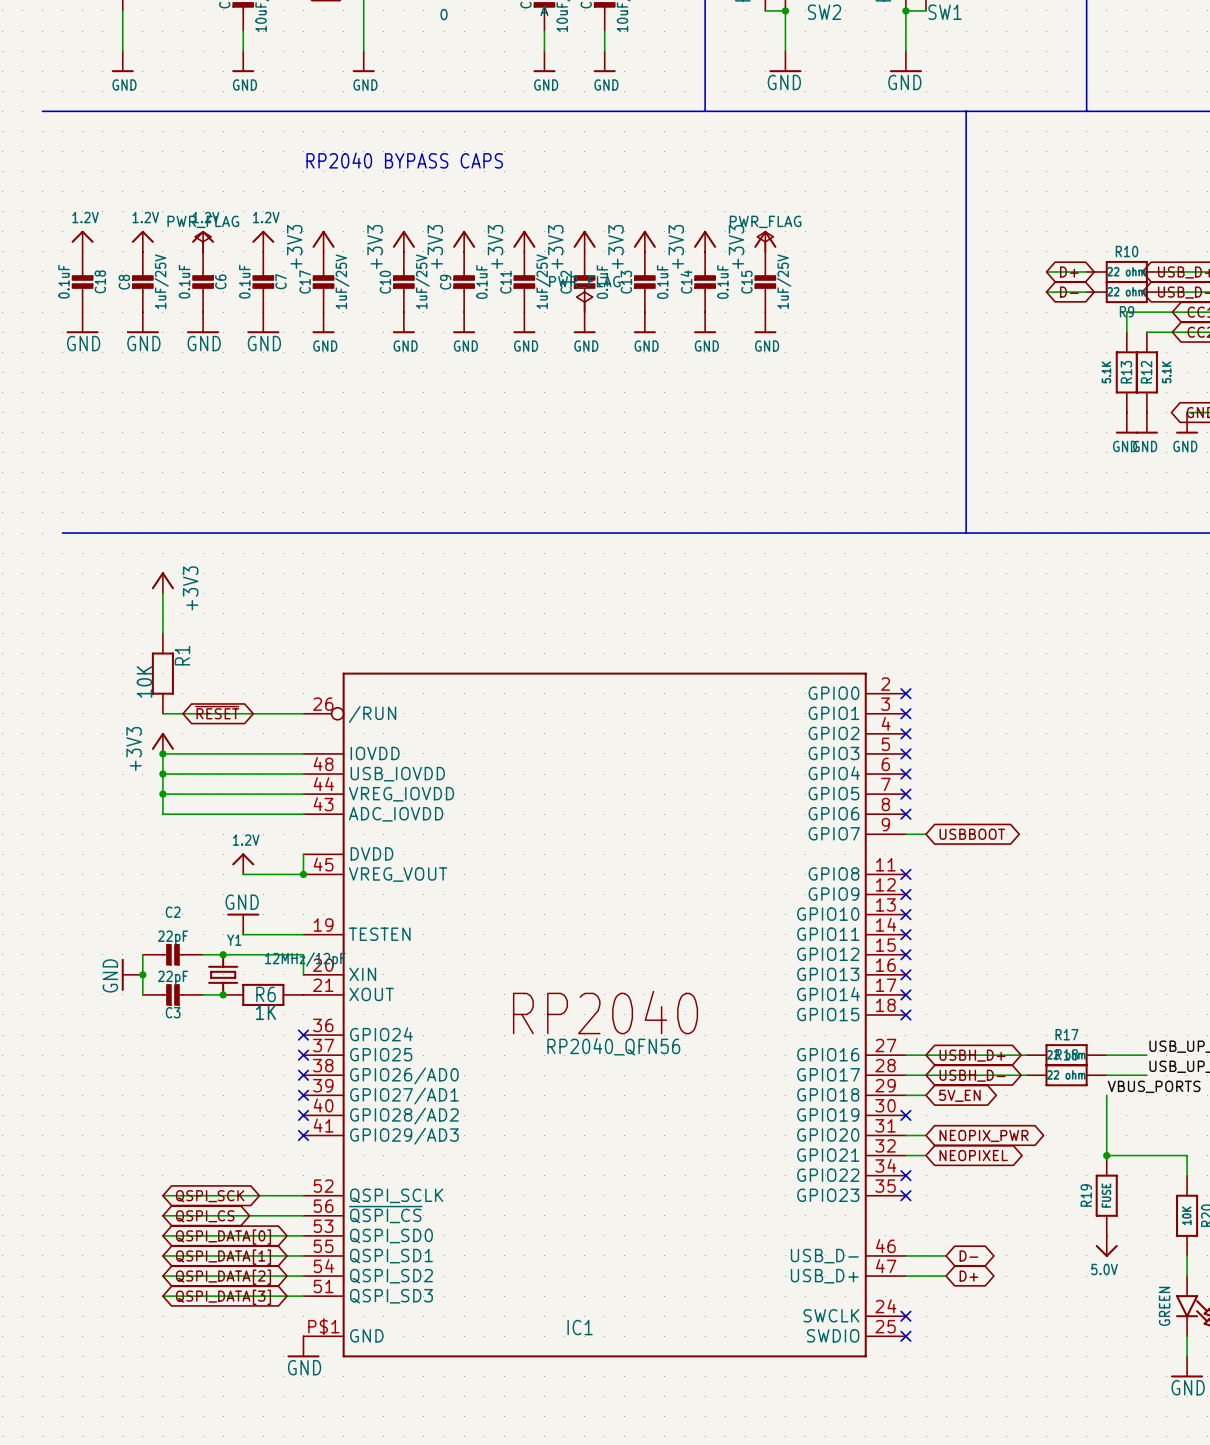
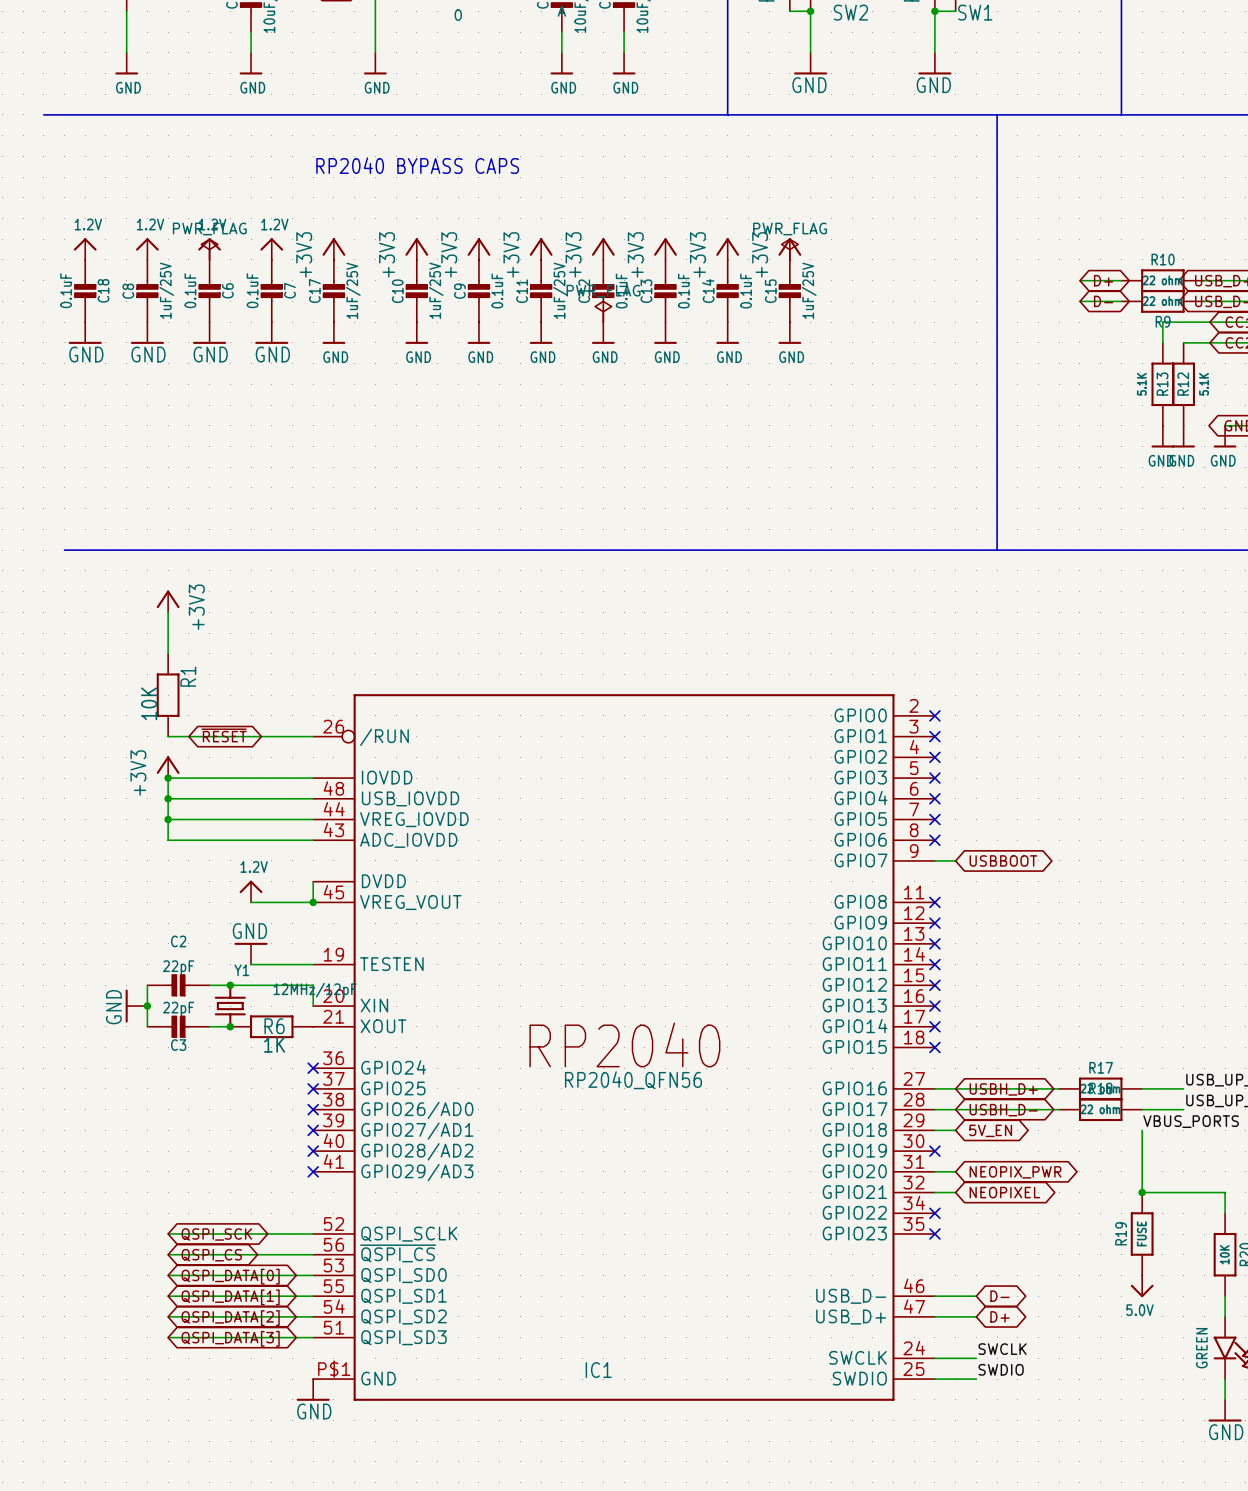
label: none -> SWCLK (1002, 1349)
wire: none -> (934, 1358) (976, 1358)
no-connect mark: (905, 1316) -> none
label: none -> SWDIO (1001, 1369)
wire: none -> (934, 1379) (976, 1379)
no-connect mark: (905, 1336) -> none

